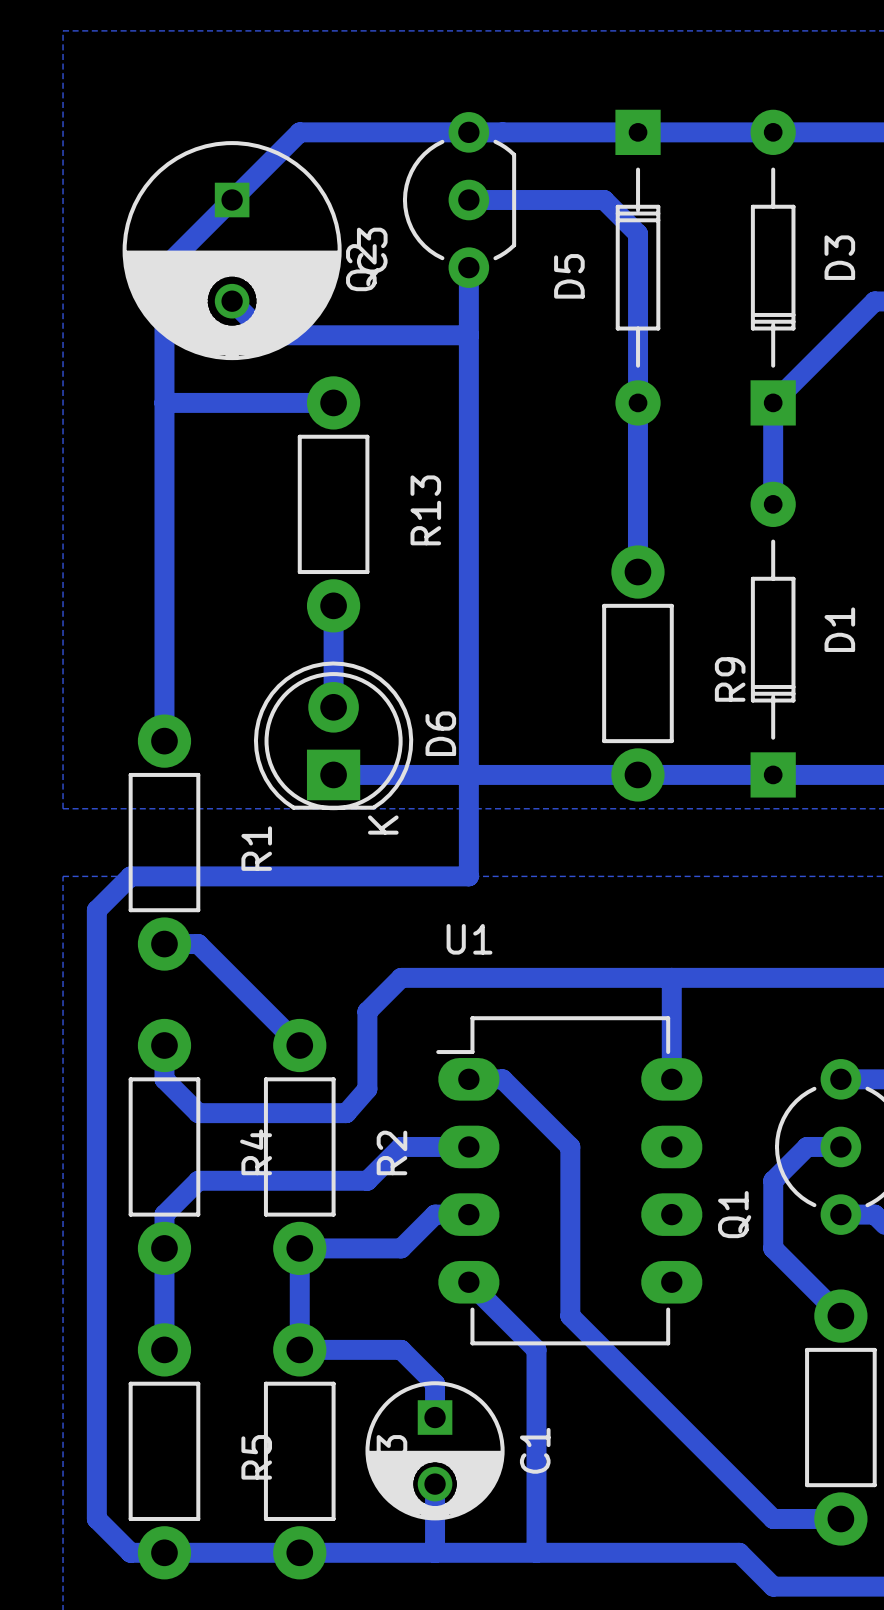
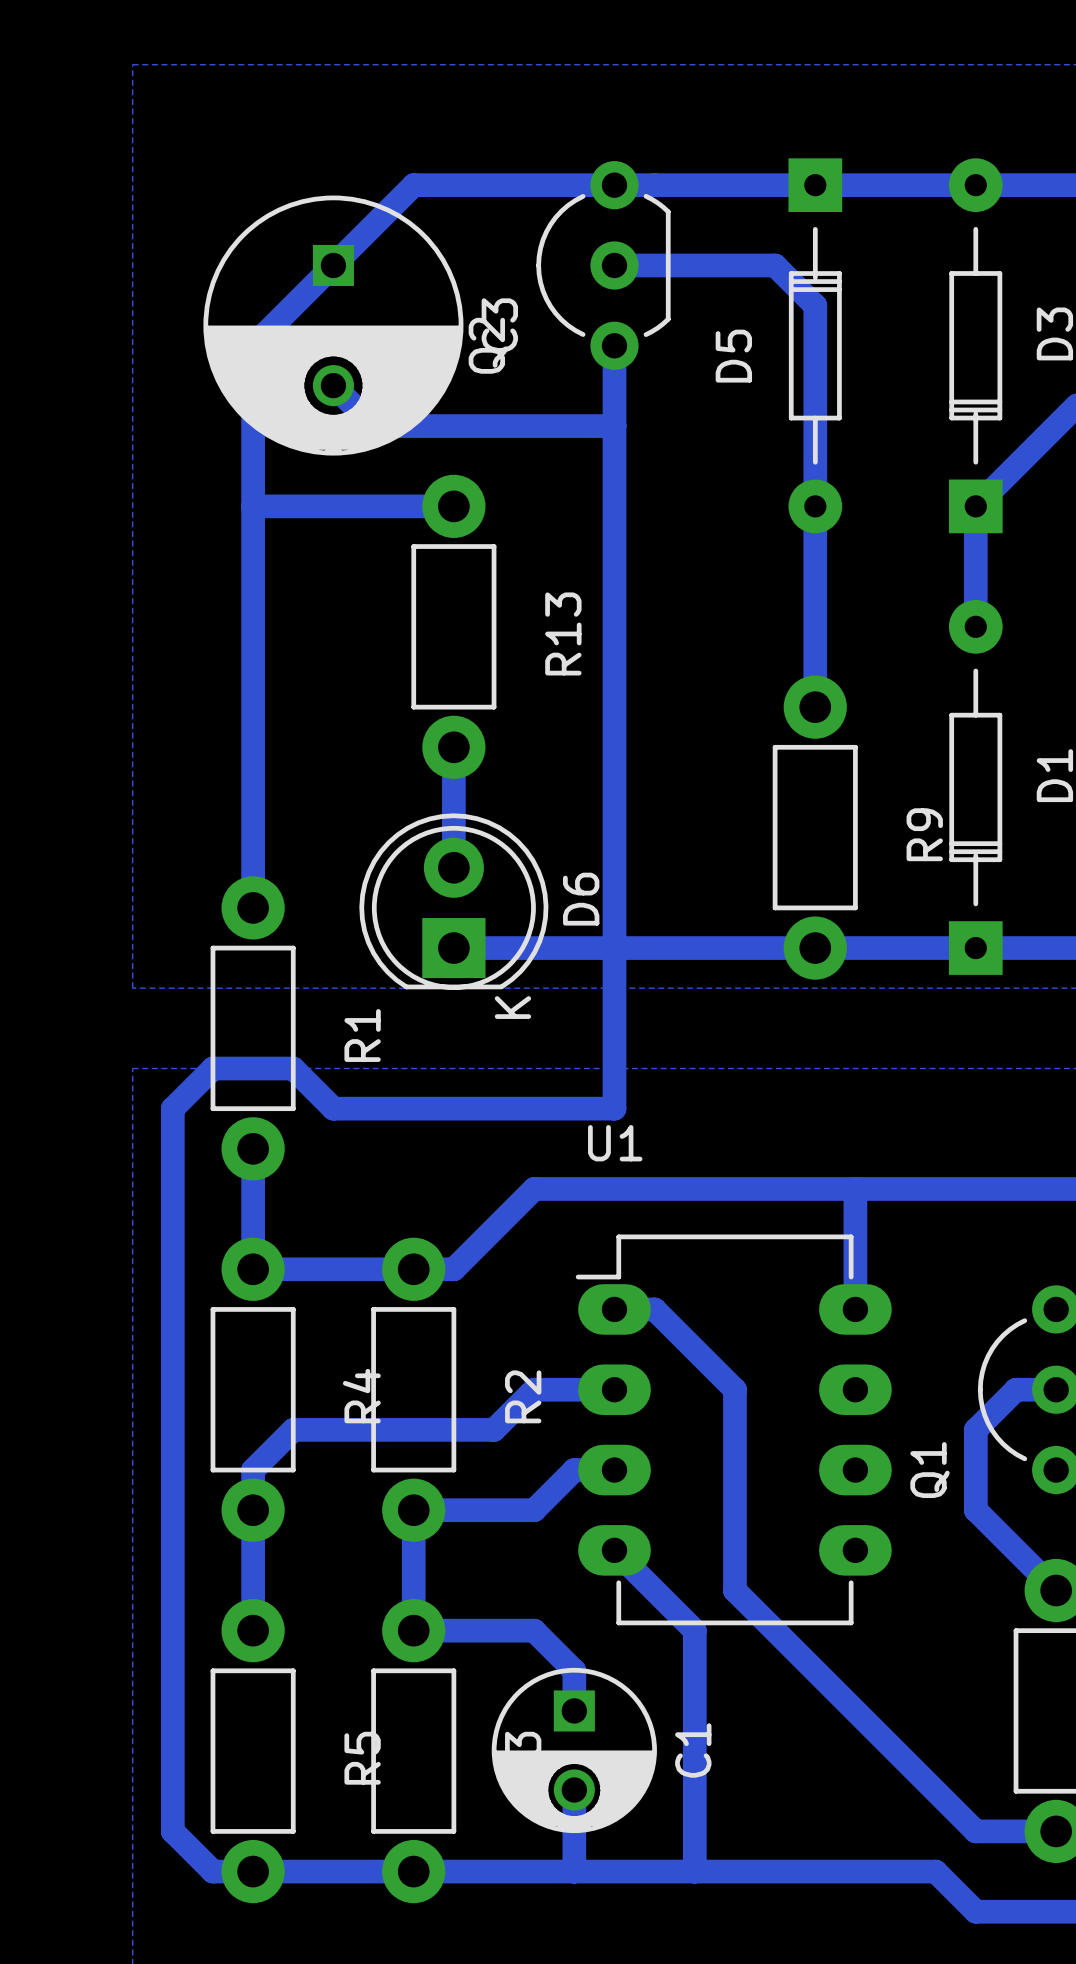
bottom track: (198, 876) (468, 876) -> (293, 1068) (333, 1108) (614, 1108) (614, 1068)
bottom track: (164, 944) (198, 944) (299, 1045) -> (253, 1148) (253, 1269) (453, 1269) (494, 1229)
bottom track: (367, 1011) (367, 1089) (346, 1113) (198, 1113) (164, 1079) (164, 1045) -> none

